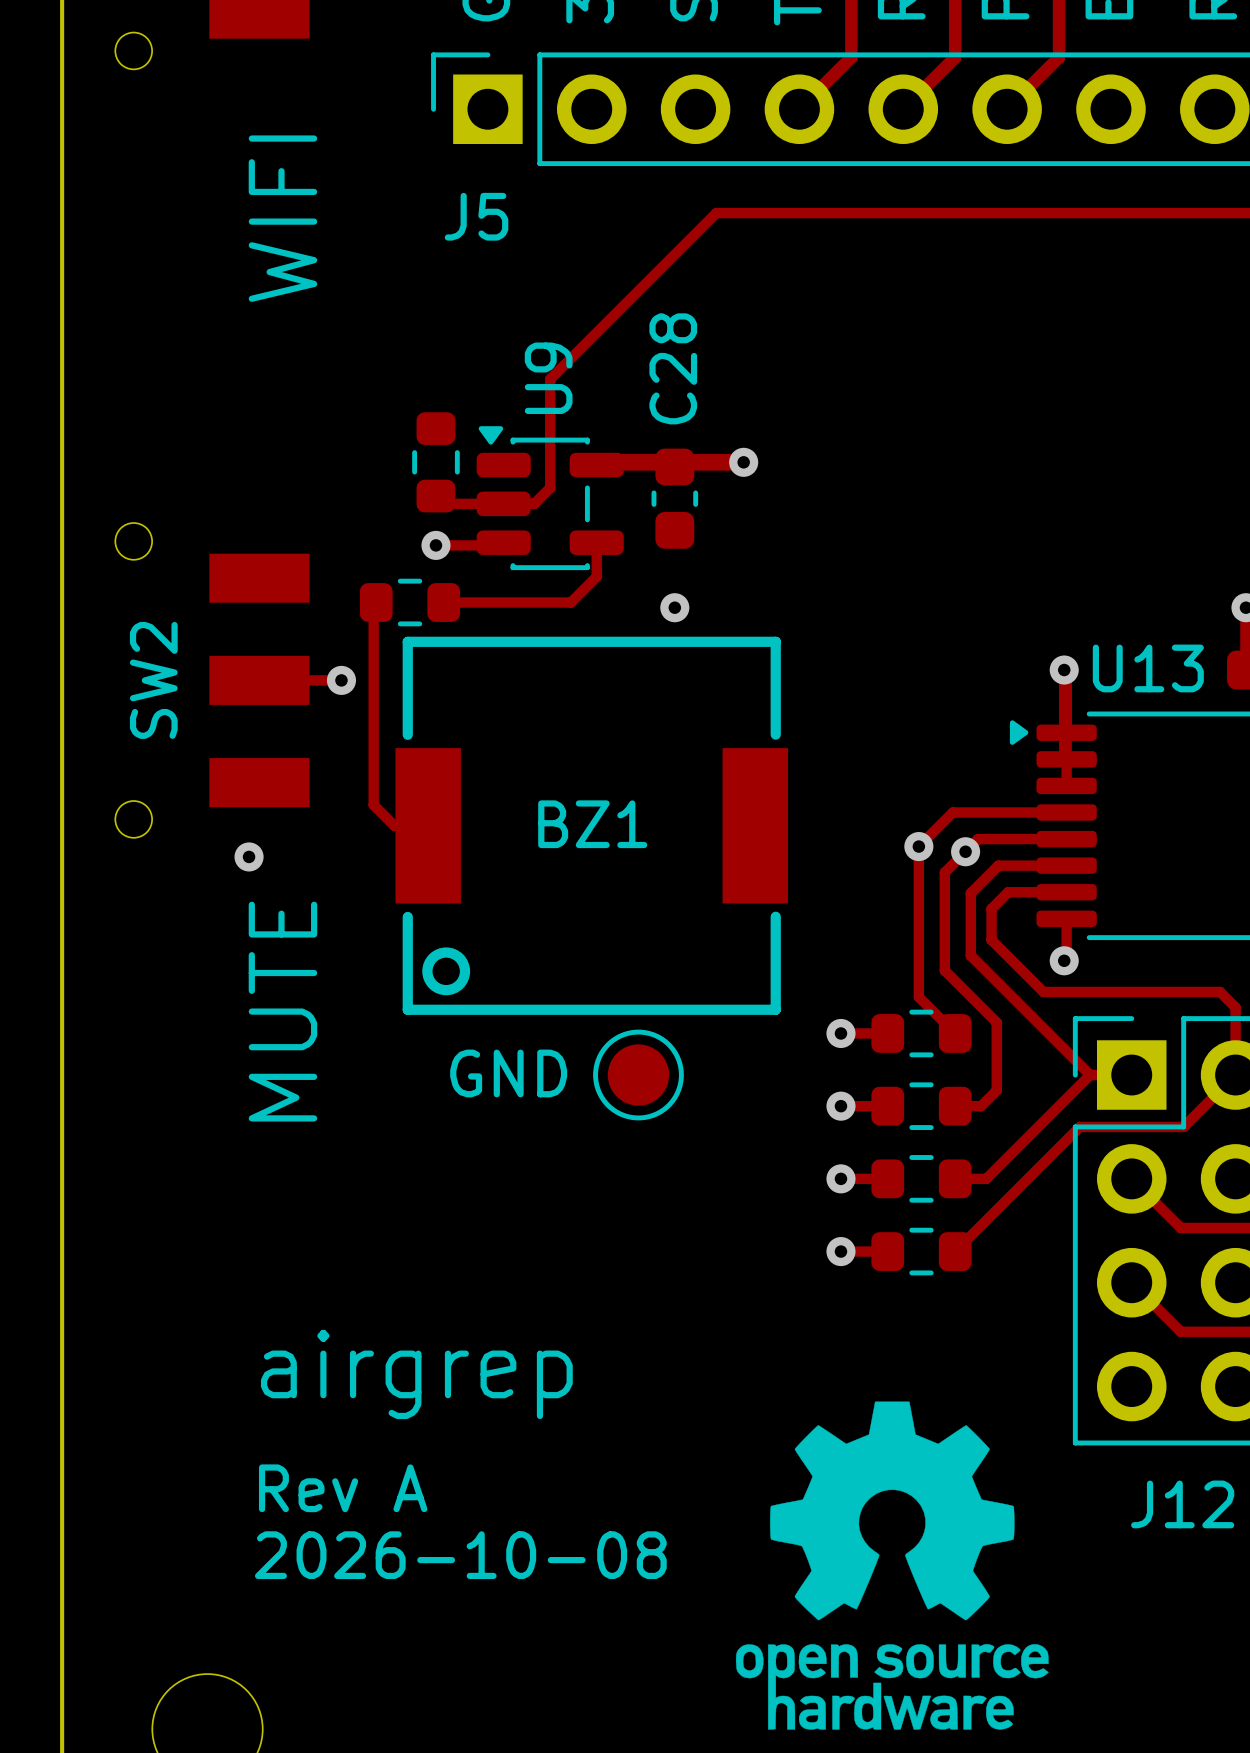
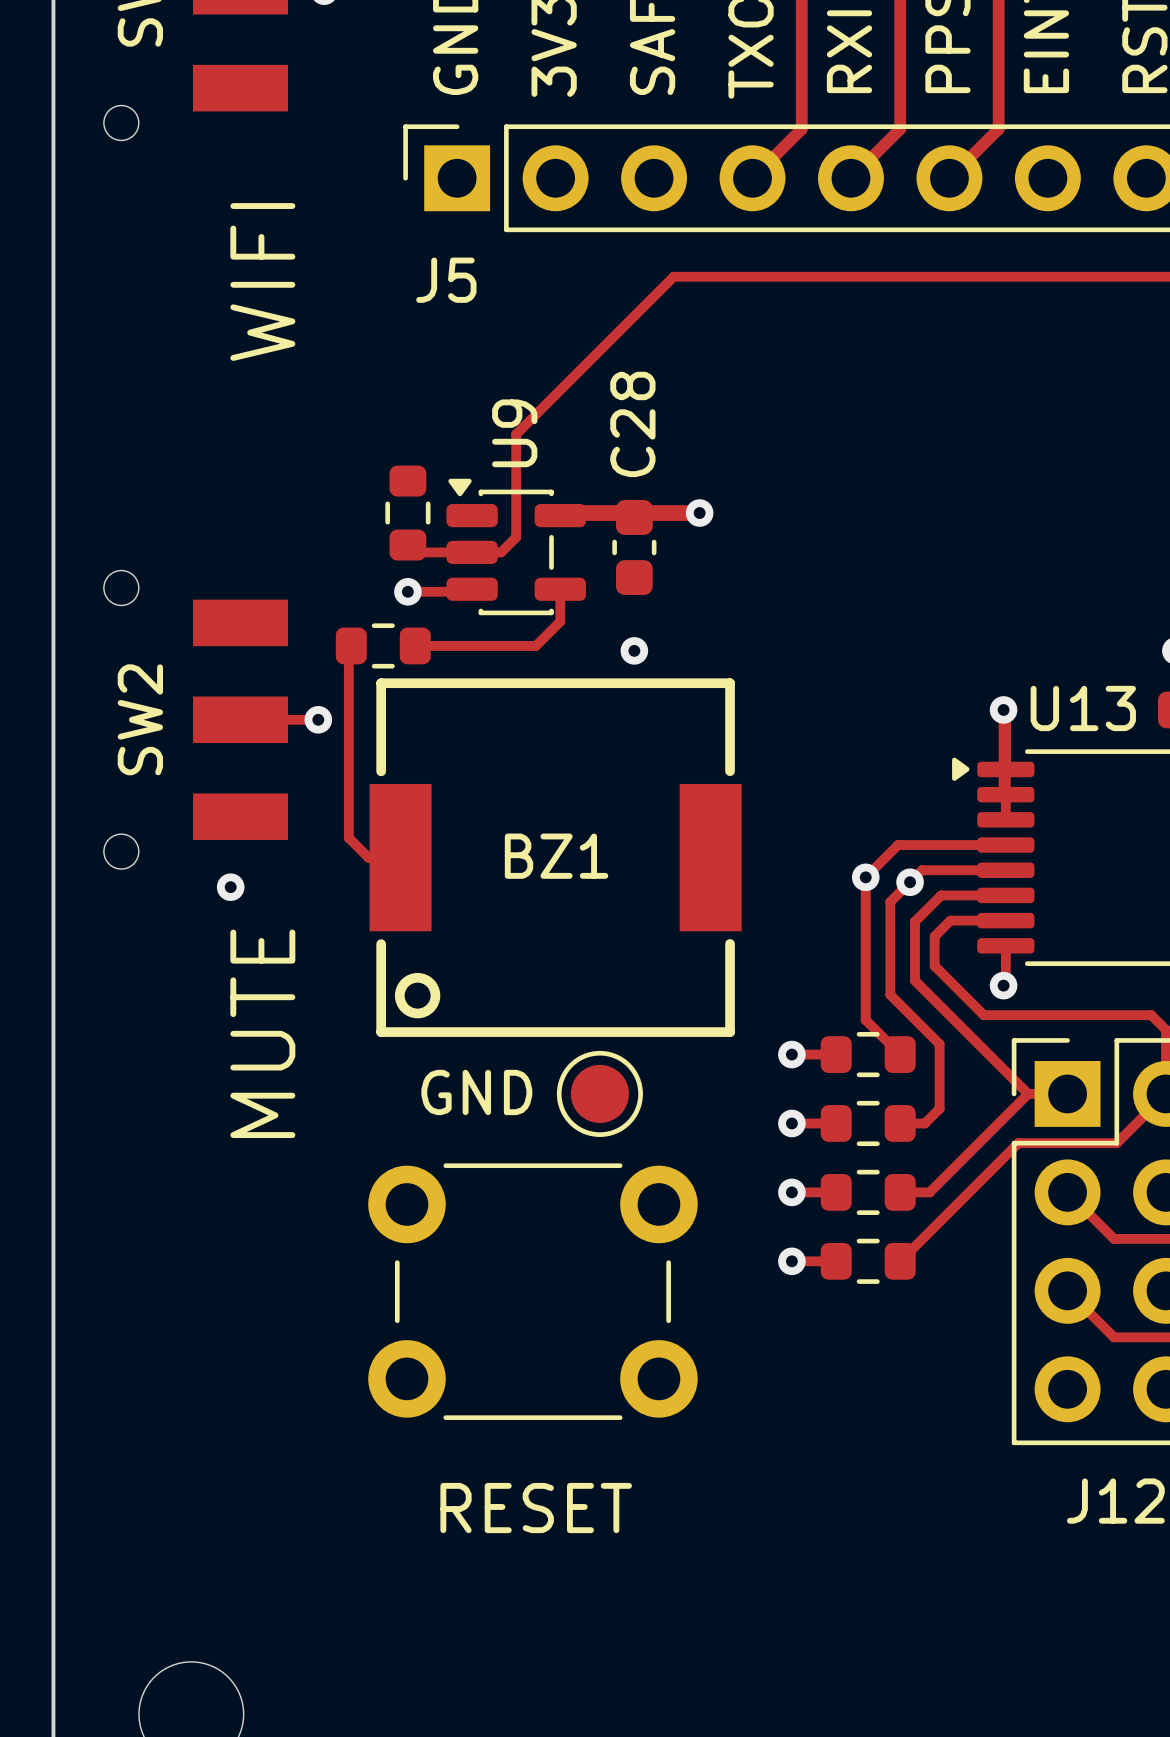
part: none -> (532, 1291)
text: airgrep (416, 1374) -> none
drawing: [735, 1401, 1049, 1730] -> none
text: Rev A (343, 1488) -> none
text: none -> RESET (536, 1508)
text: 2026-10-08 (460, 1555) -> none

